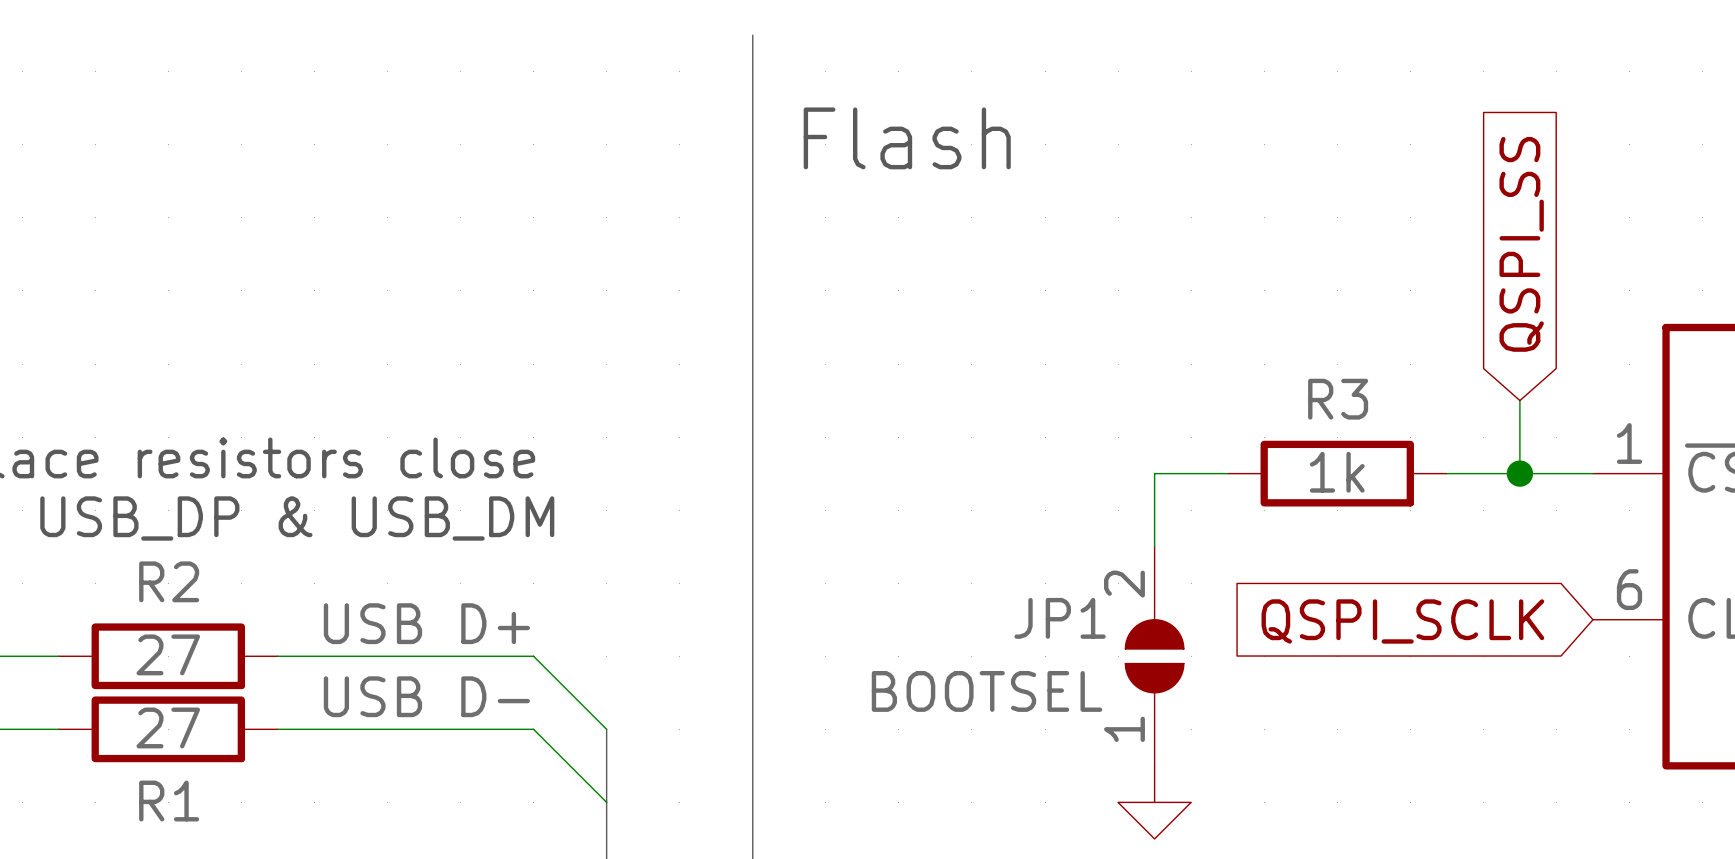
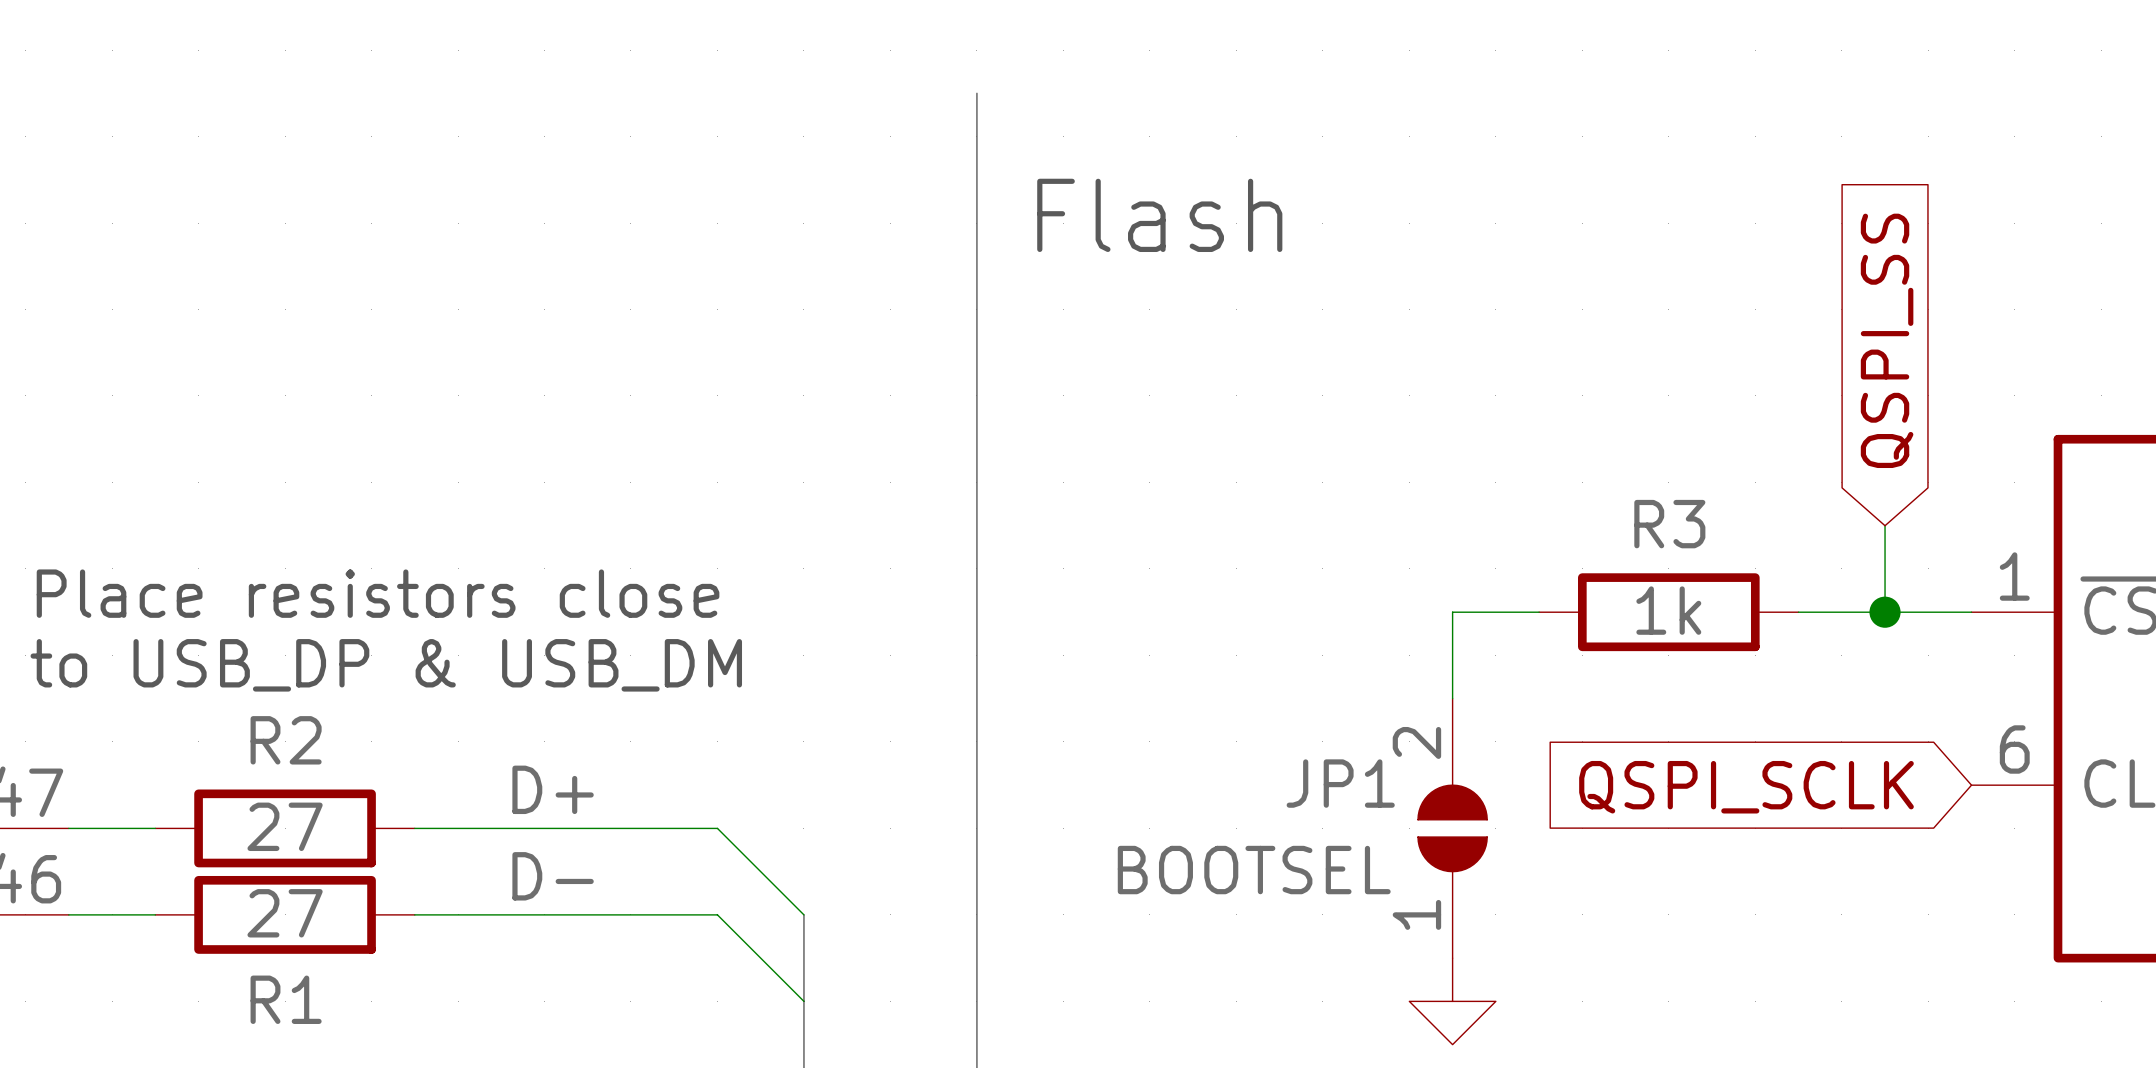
label: none -> D+ (553, 789)
label: USB D+ (426, 623) -> none
label: none -> D- (553, 876)
label: USB D- (426, 696) -> none

